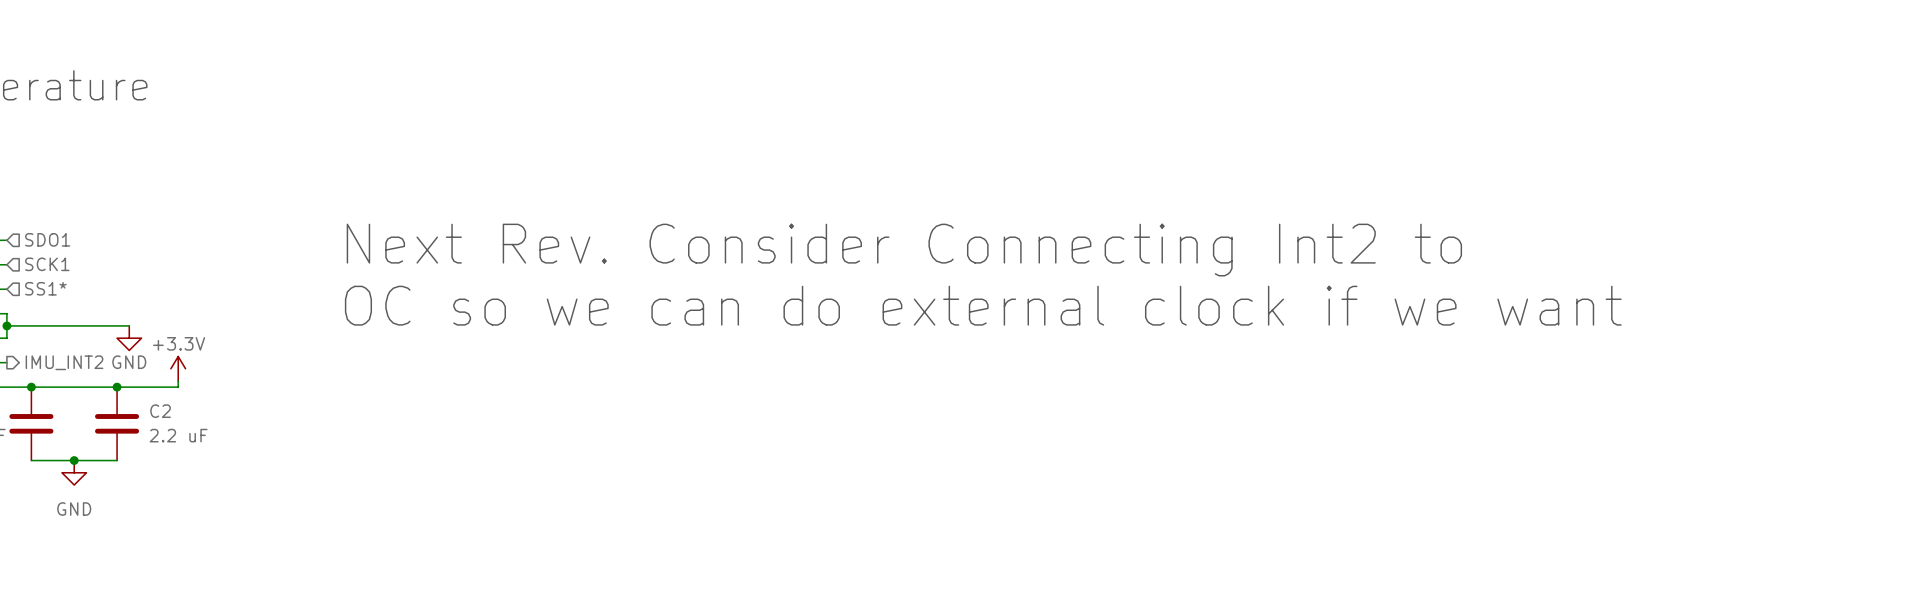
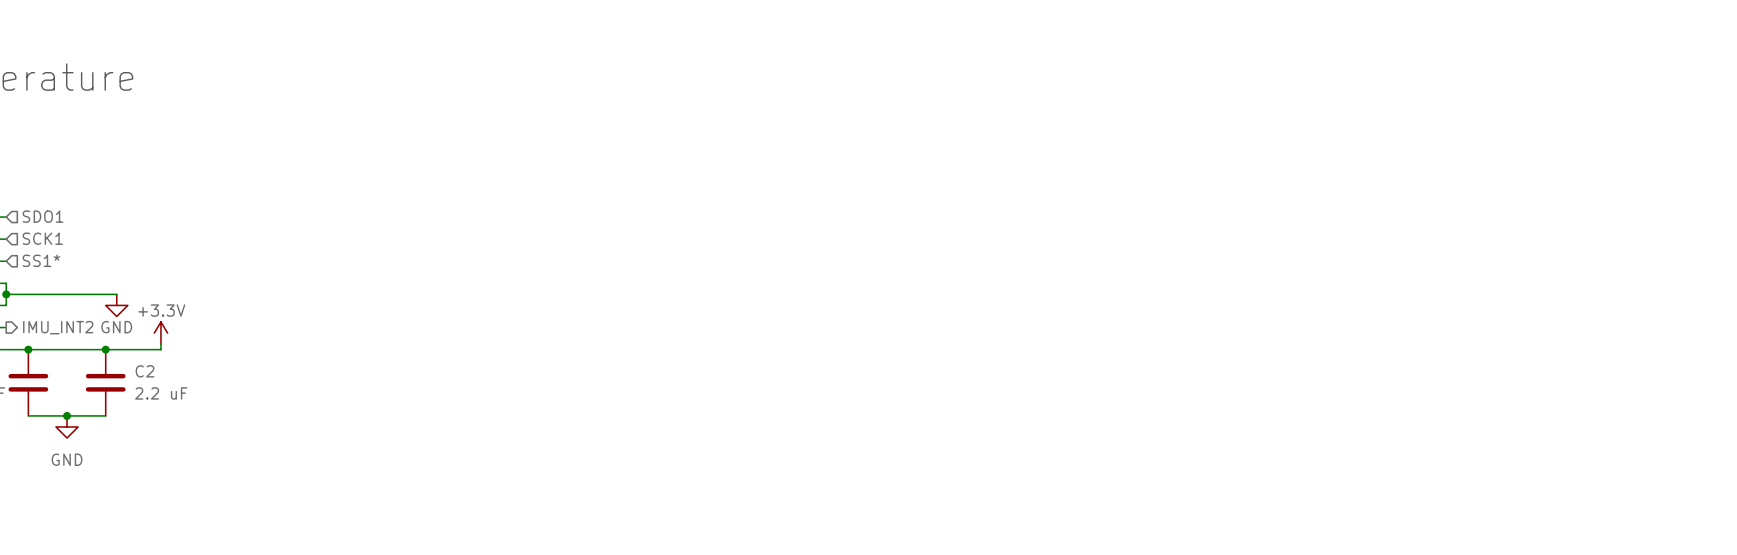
text: Next Rev. Consider Connecting Int2 to (904, 250) -> none
text: OC so we can do external clock if we want (983, 305) -> none

